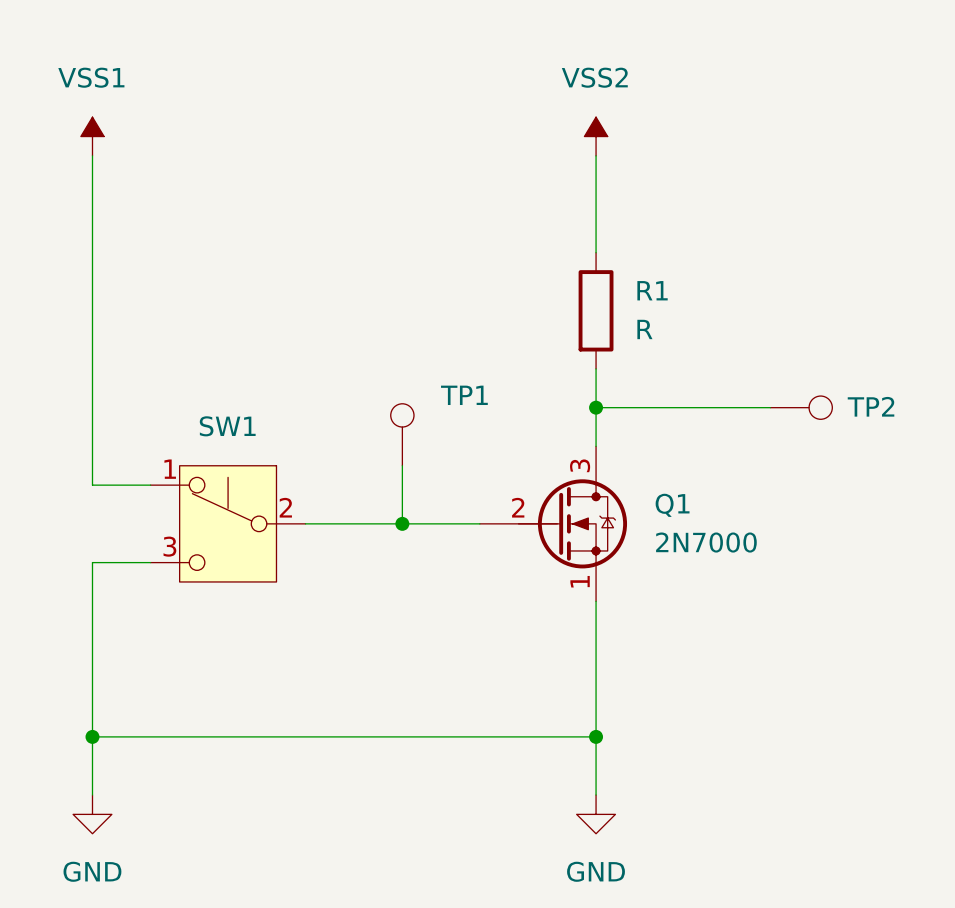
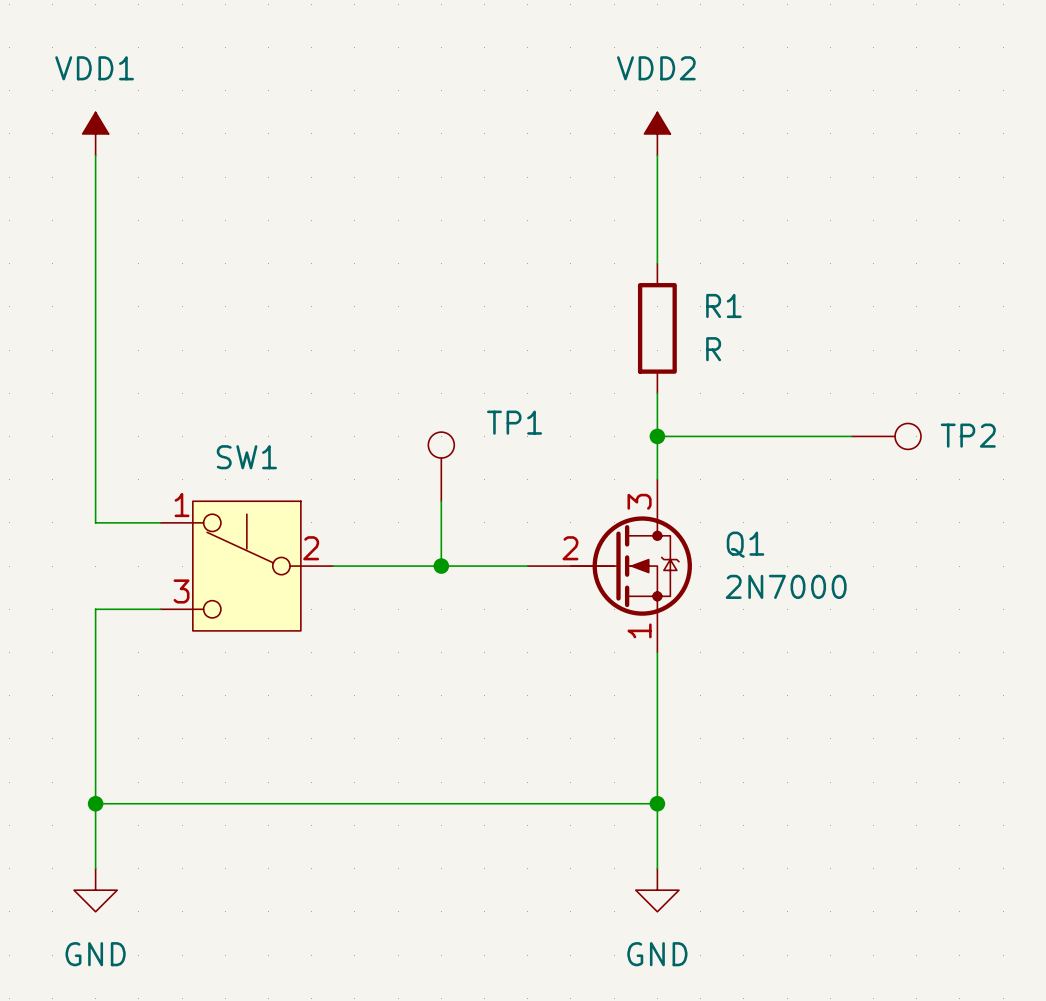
power symbol: VSS1 (92, 136) -> VDD1 (95, 133)
power symbol: VSS2 (596, 136) -> VDD2 (657, 133)

